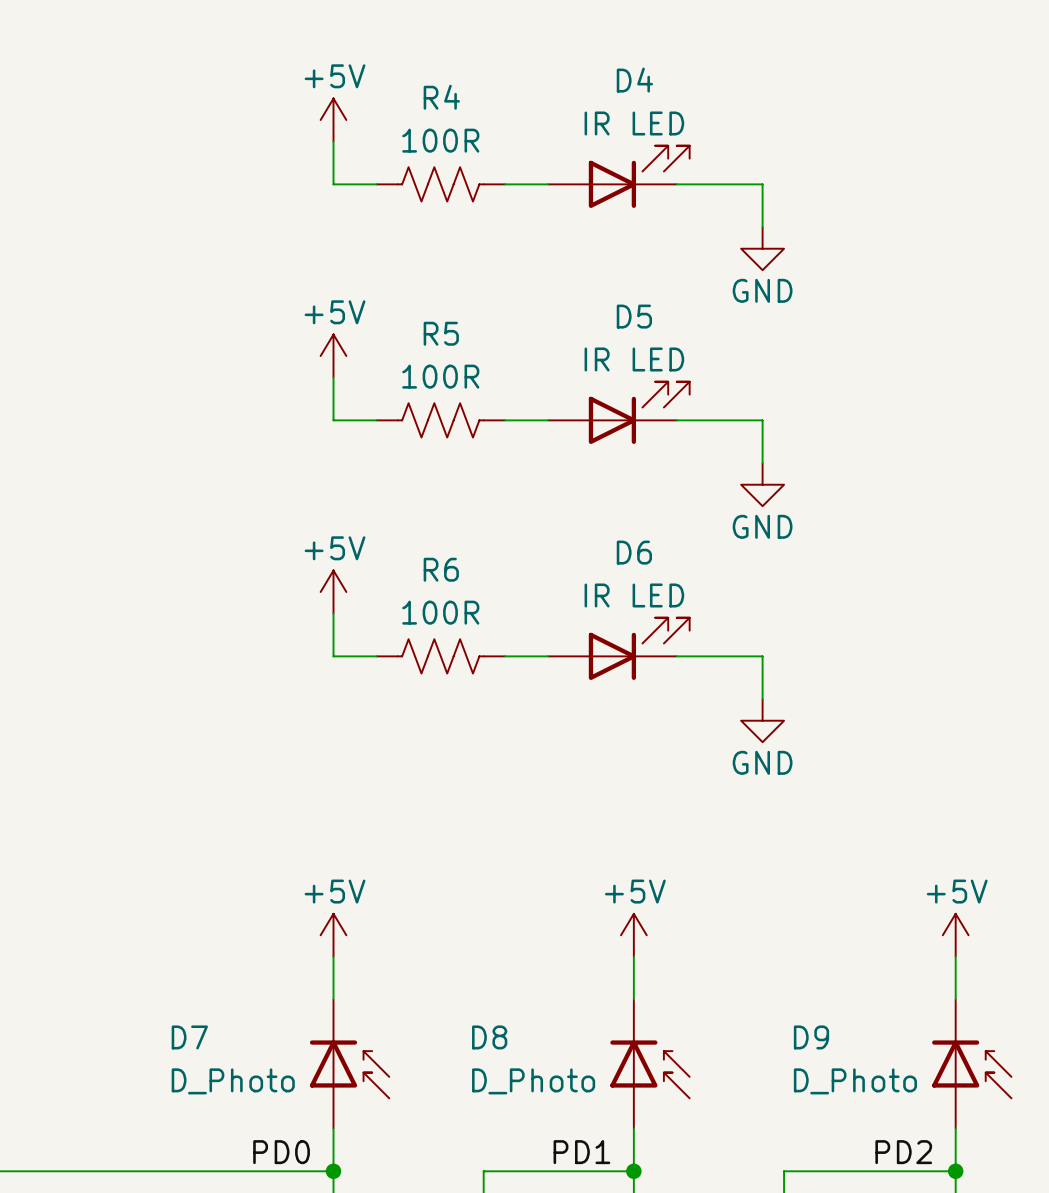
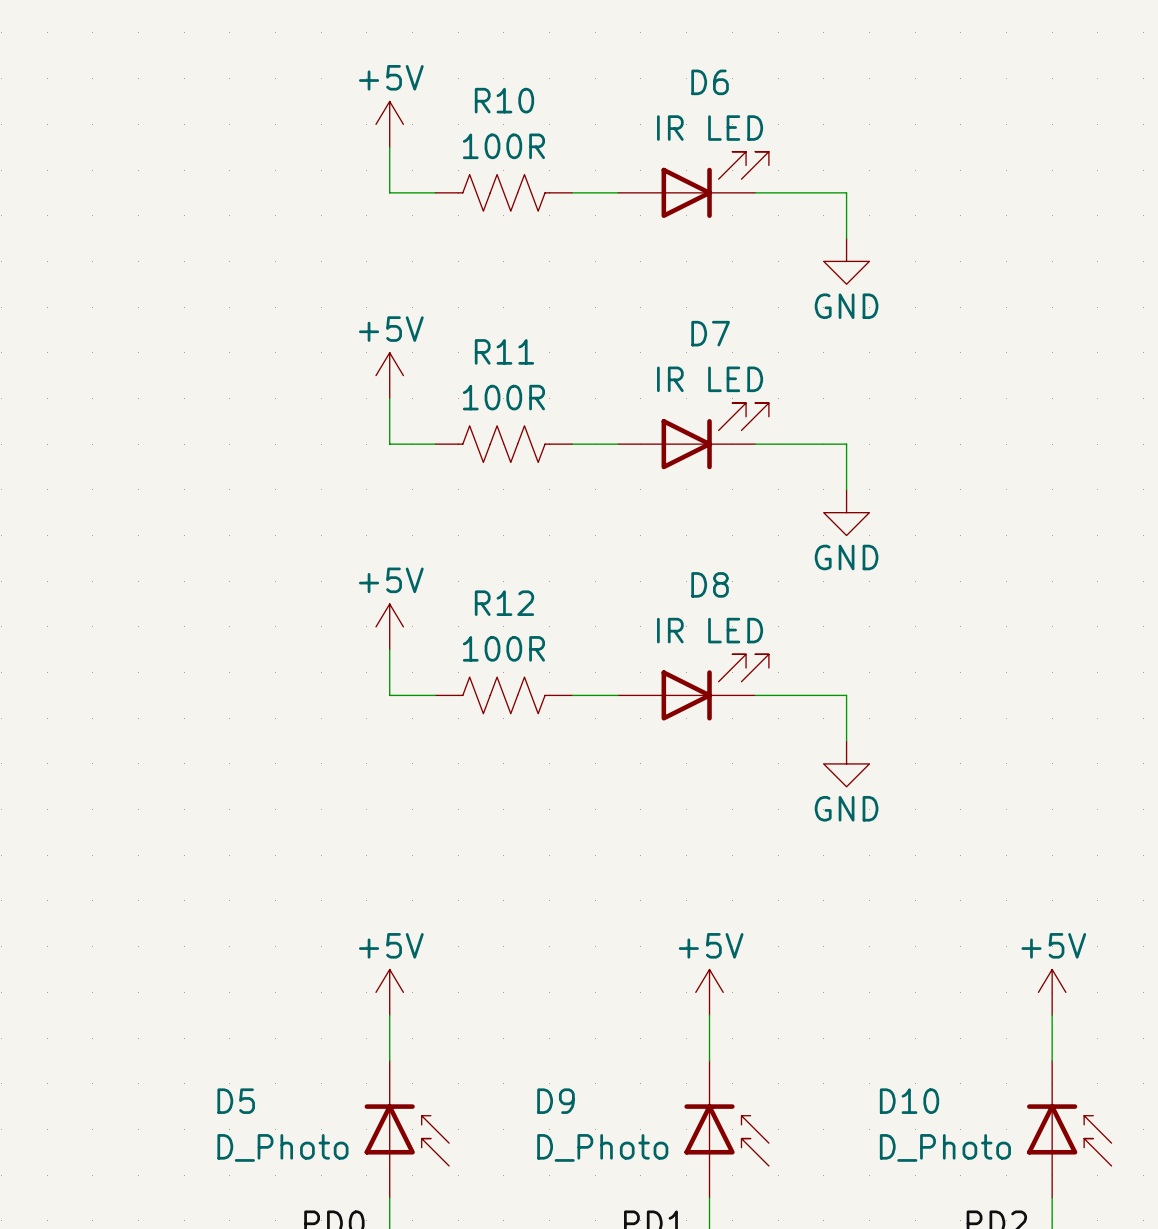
D4 name: D4 (634, 80) -> D6 (710, 82)
R4 name: R4 (441, 97) -> R10 (504, 100)
D5 name: D5 (634, 316) -> D7 (710, 333)
R5 name: R5 (441, 333) -> R11 (504, 351)
D6 name: D6 (634, 552) -> D8 (710, 584)
R6 name: R6 (441, 569) -> R12 (504, 603)
D7 name: D7 (189, 1037) -> D5 (236, 1101)
D8 name: D8 (489, 1037) -> D9 (555, 1101)
D9 name: D9 (811, 1037) -> D10 (909, 1101)

